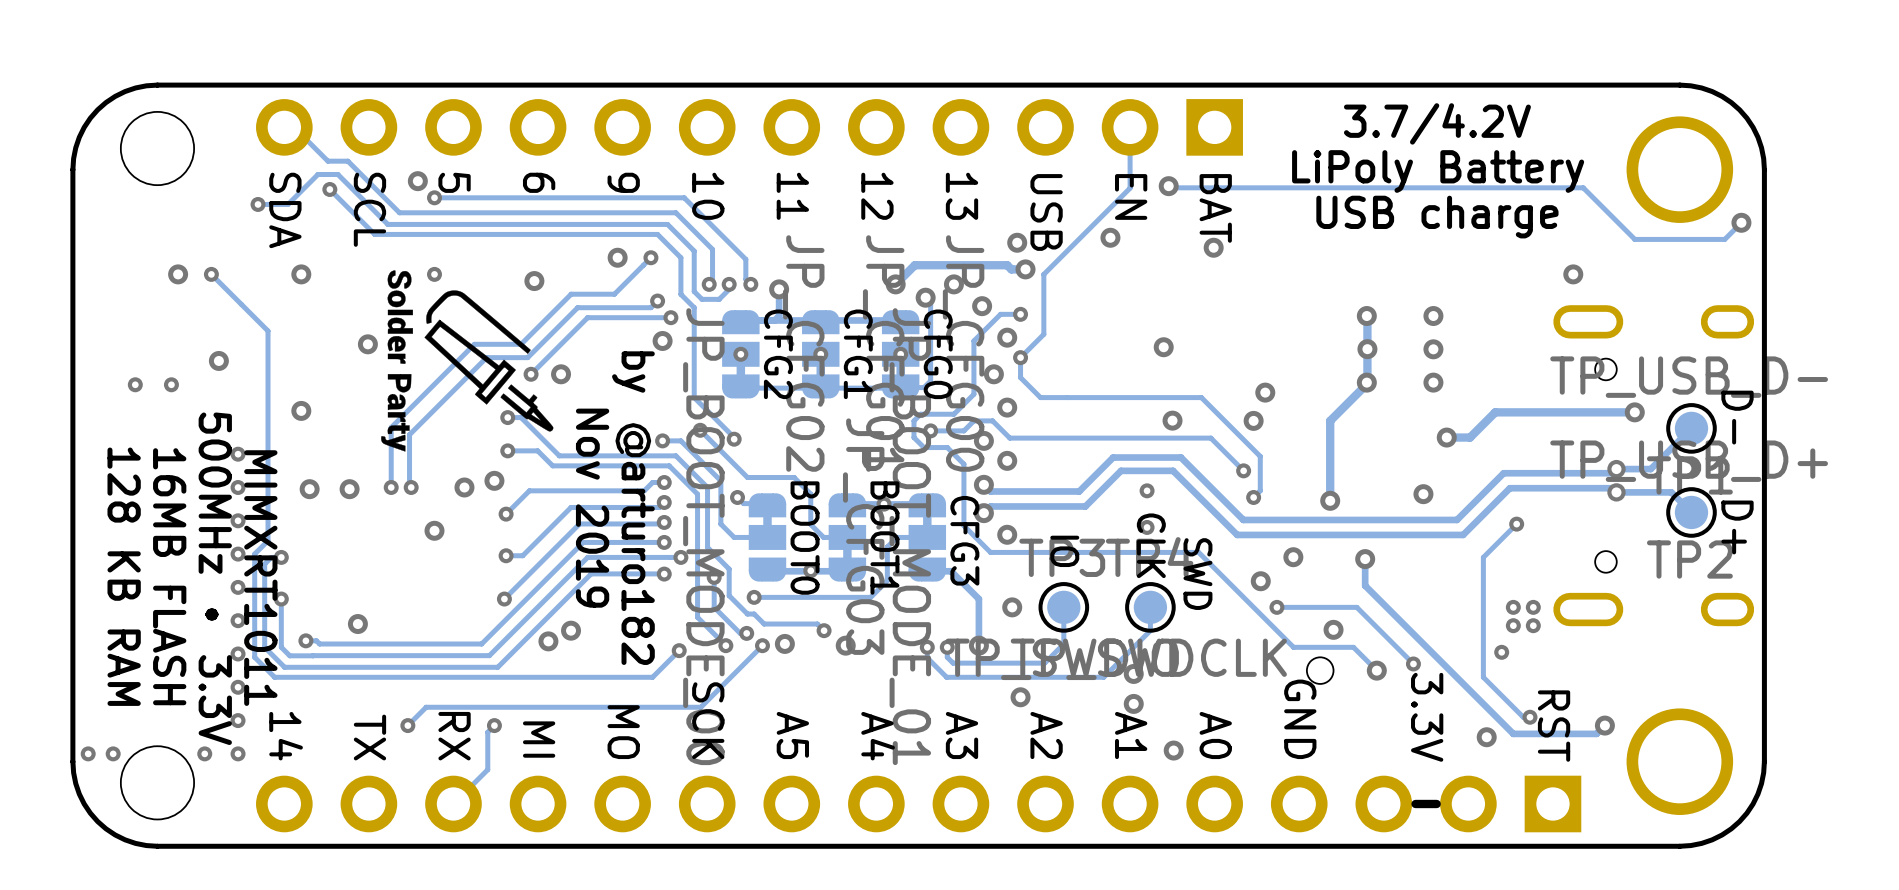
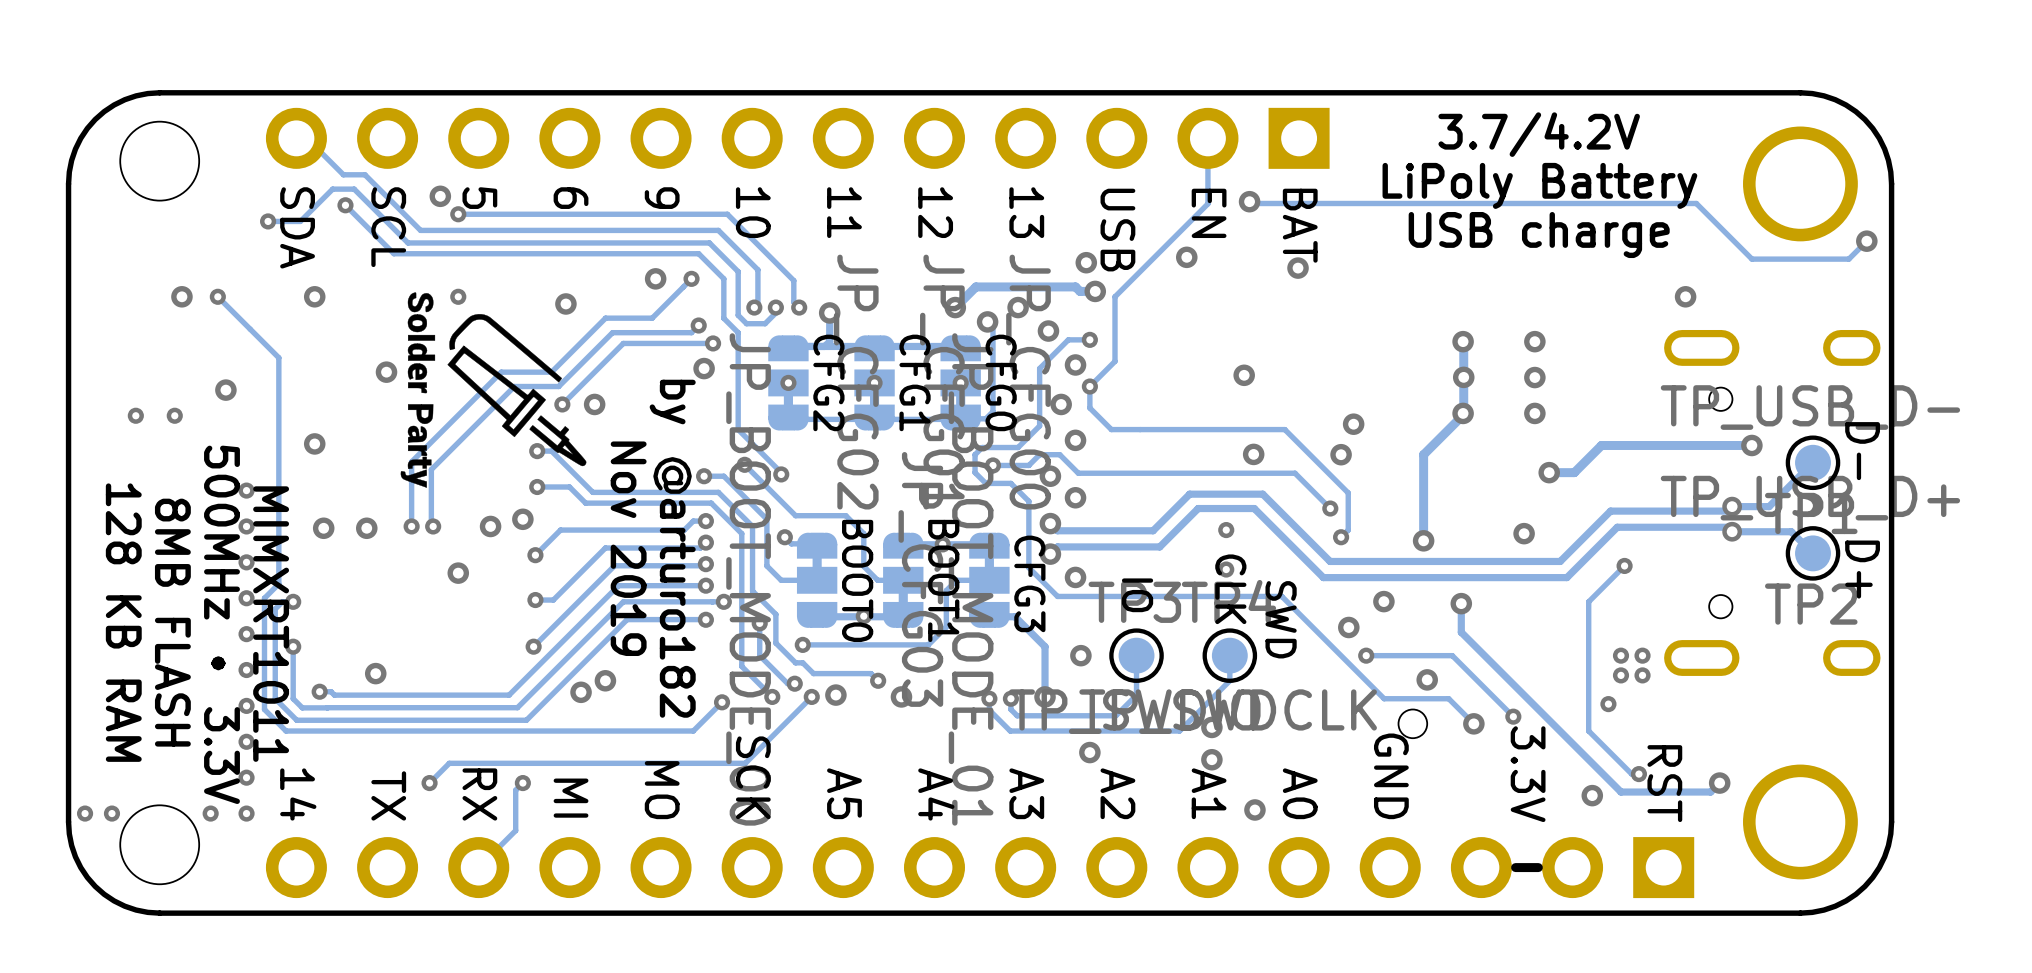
text: 16MB FLASH (169, 576) -> 8MB FLASH (172, 622)

